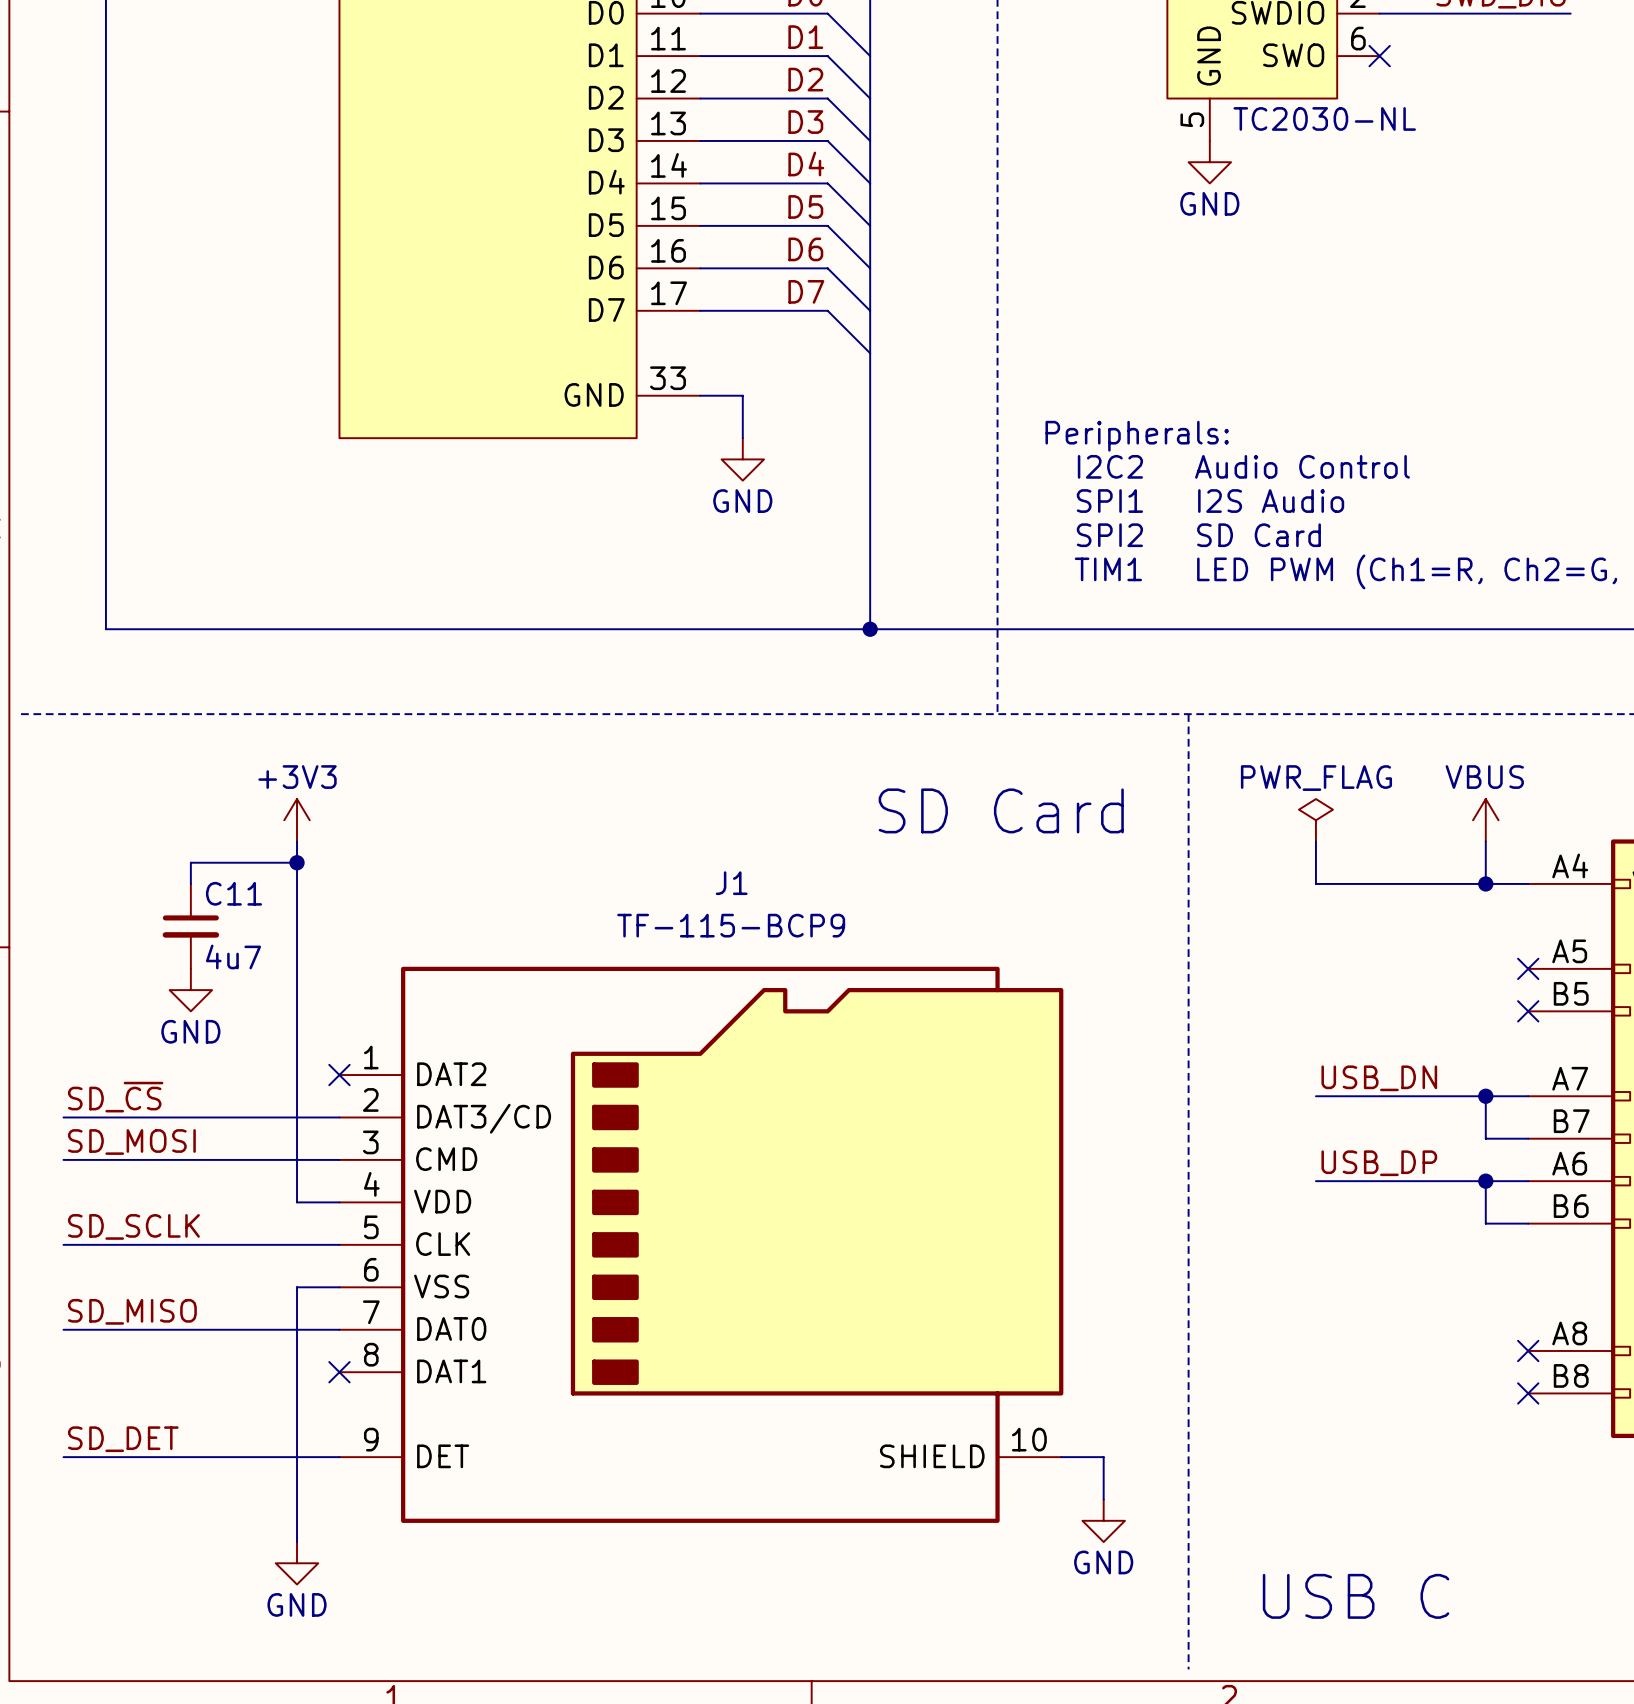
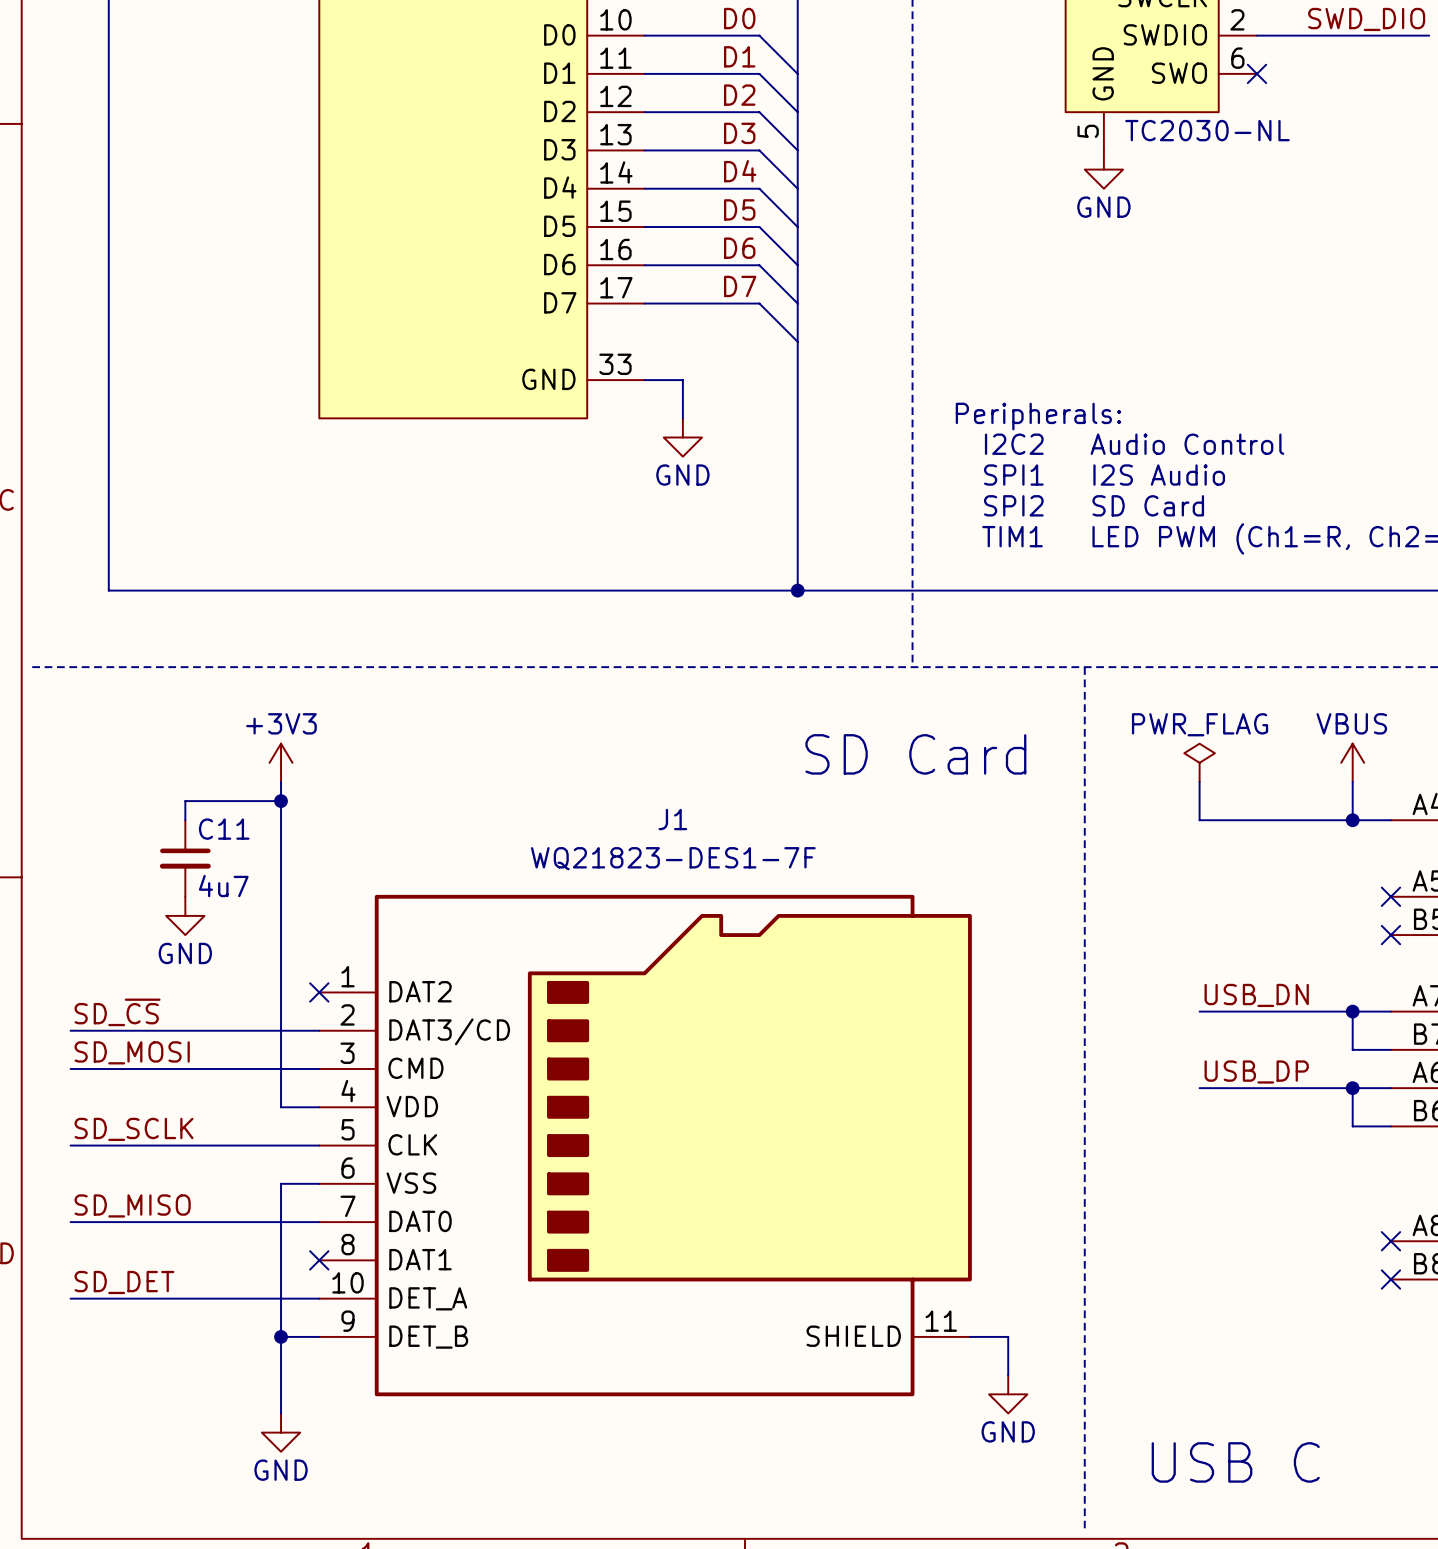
J1 value: TF-115-BCP9 (731, 925) -> WQ21823-DES1-7F (673, 858)
J1 symbol: [339, 966, 1064, 1523] -> [319, 894, 972, 1397]
wire: none -> (70, 1298) (319, 1298)
label position: SD_DET (123, 1439) -> SD_DET (124, 1282)
wire: (63, 1457) (297, 1457) -> none
junction: none -> (281, 1336)

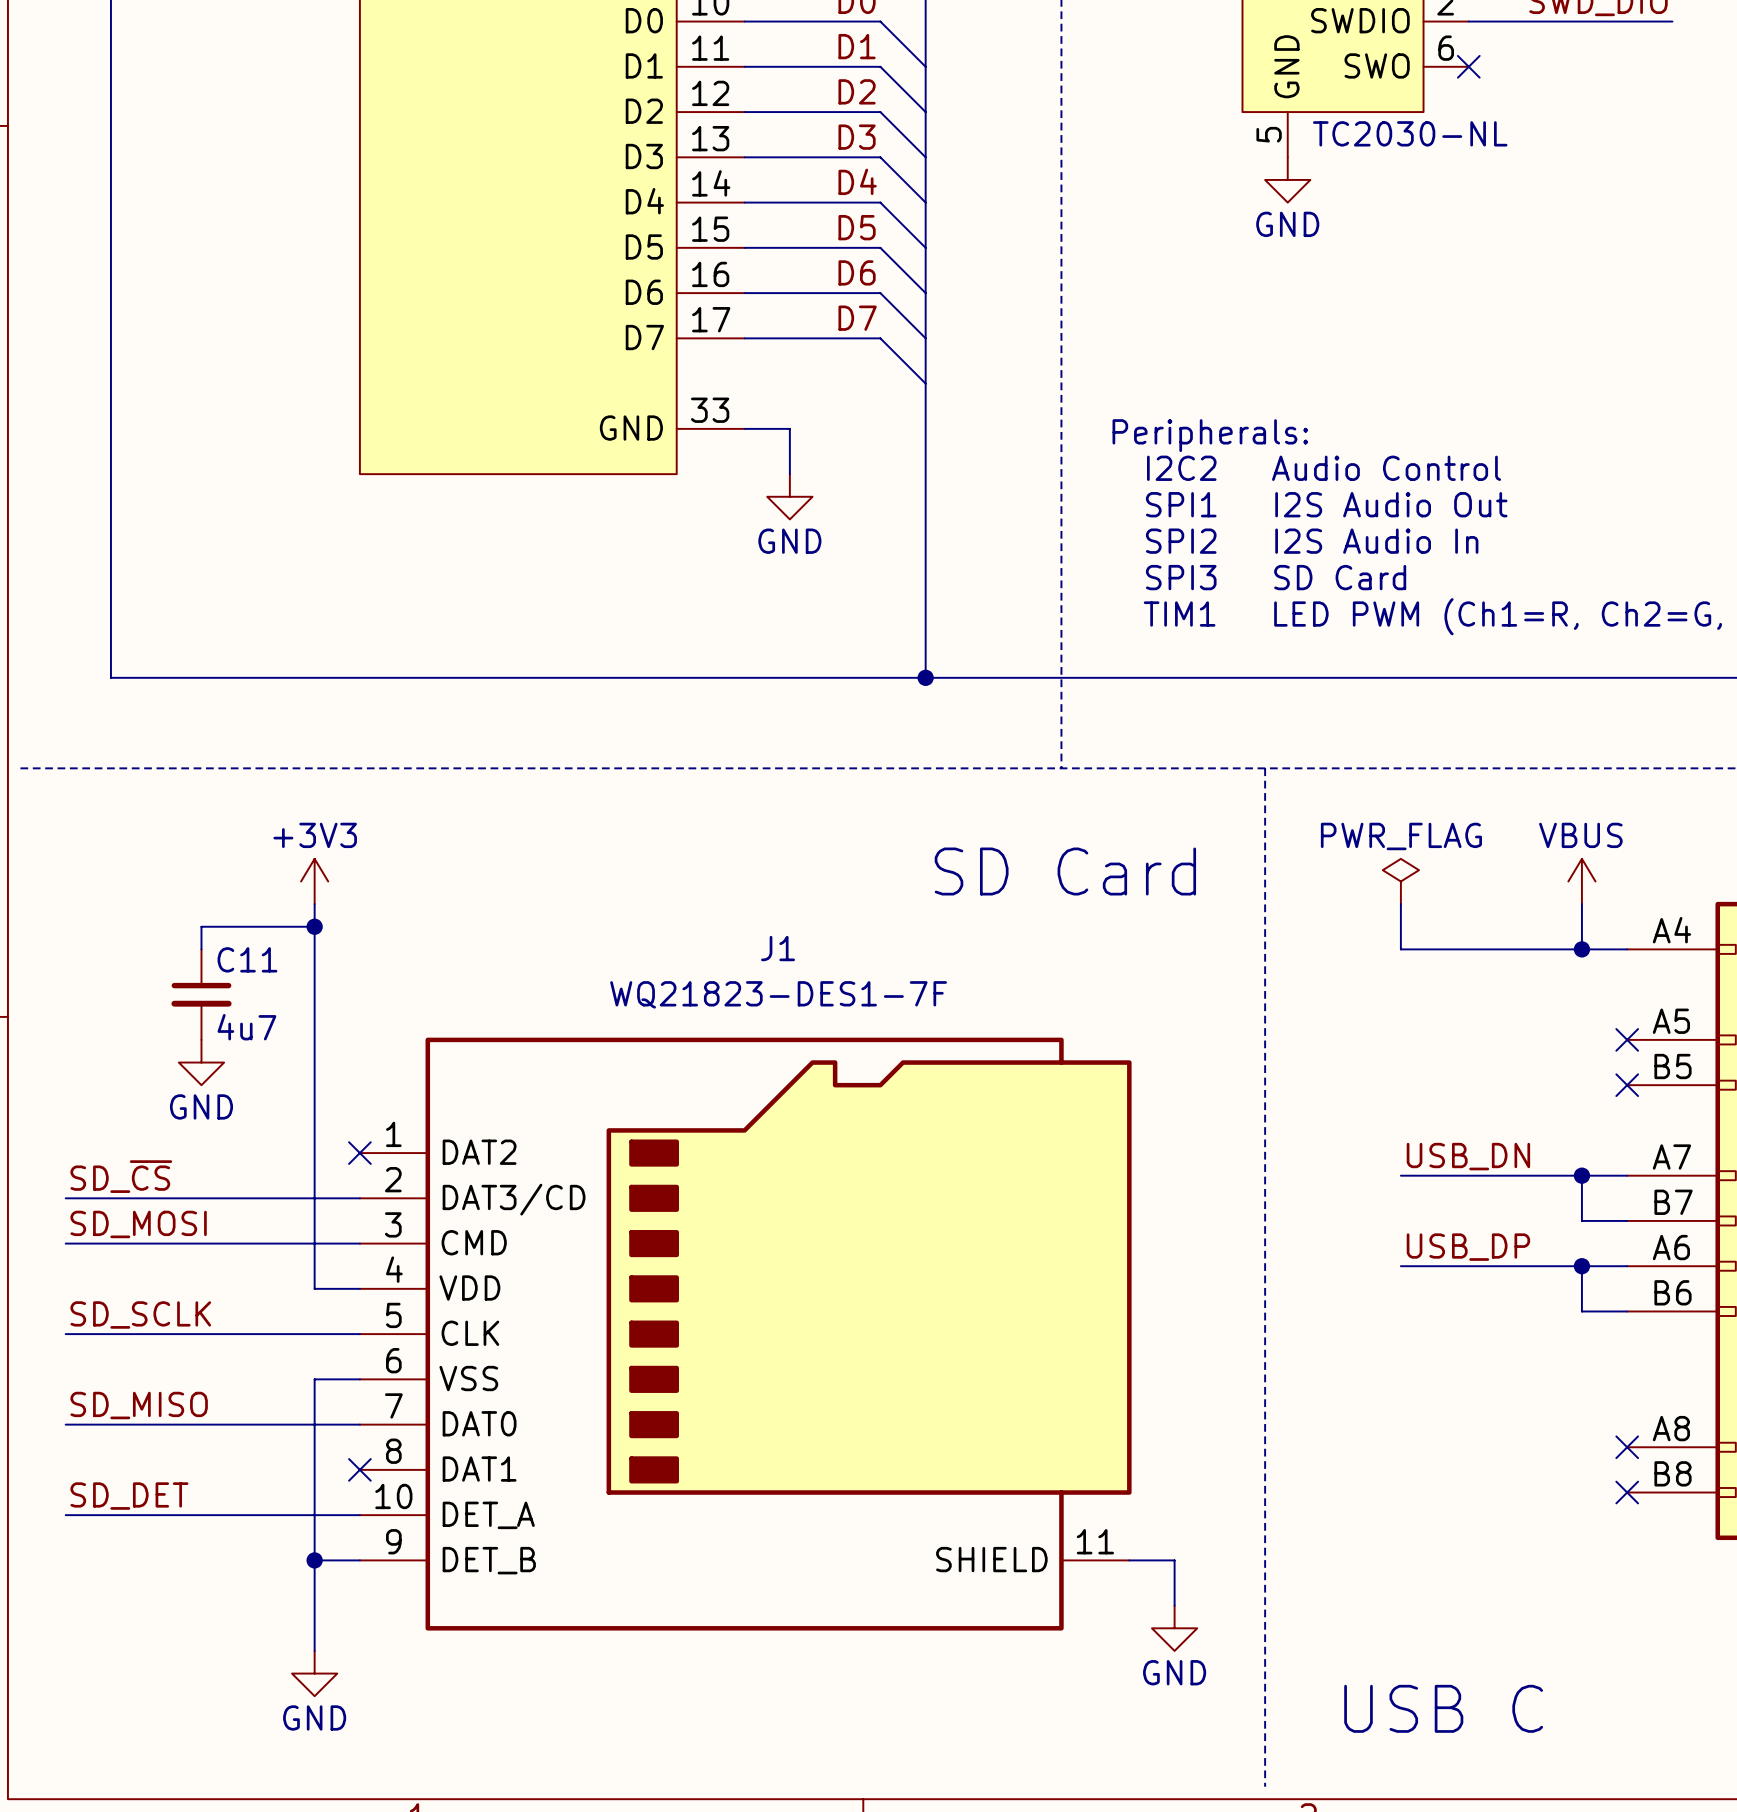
text: none -> Peripherals: (1210, 435)
text: Peripherals: (1038, 416) -> I2C2 Audio Control (1324, 468)
text: I2C2 Audio Control (1134, 444) -> SPI1 I2S Audio Out (1326, 504)
text: SPI1 I2S Audio (1104, 475) -> SPI2 I2S Audio In (1312, 541)
text: SPI2 SD Card (1094, 505) -> SPI3 SD Card (1276, 577)

